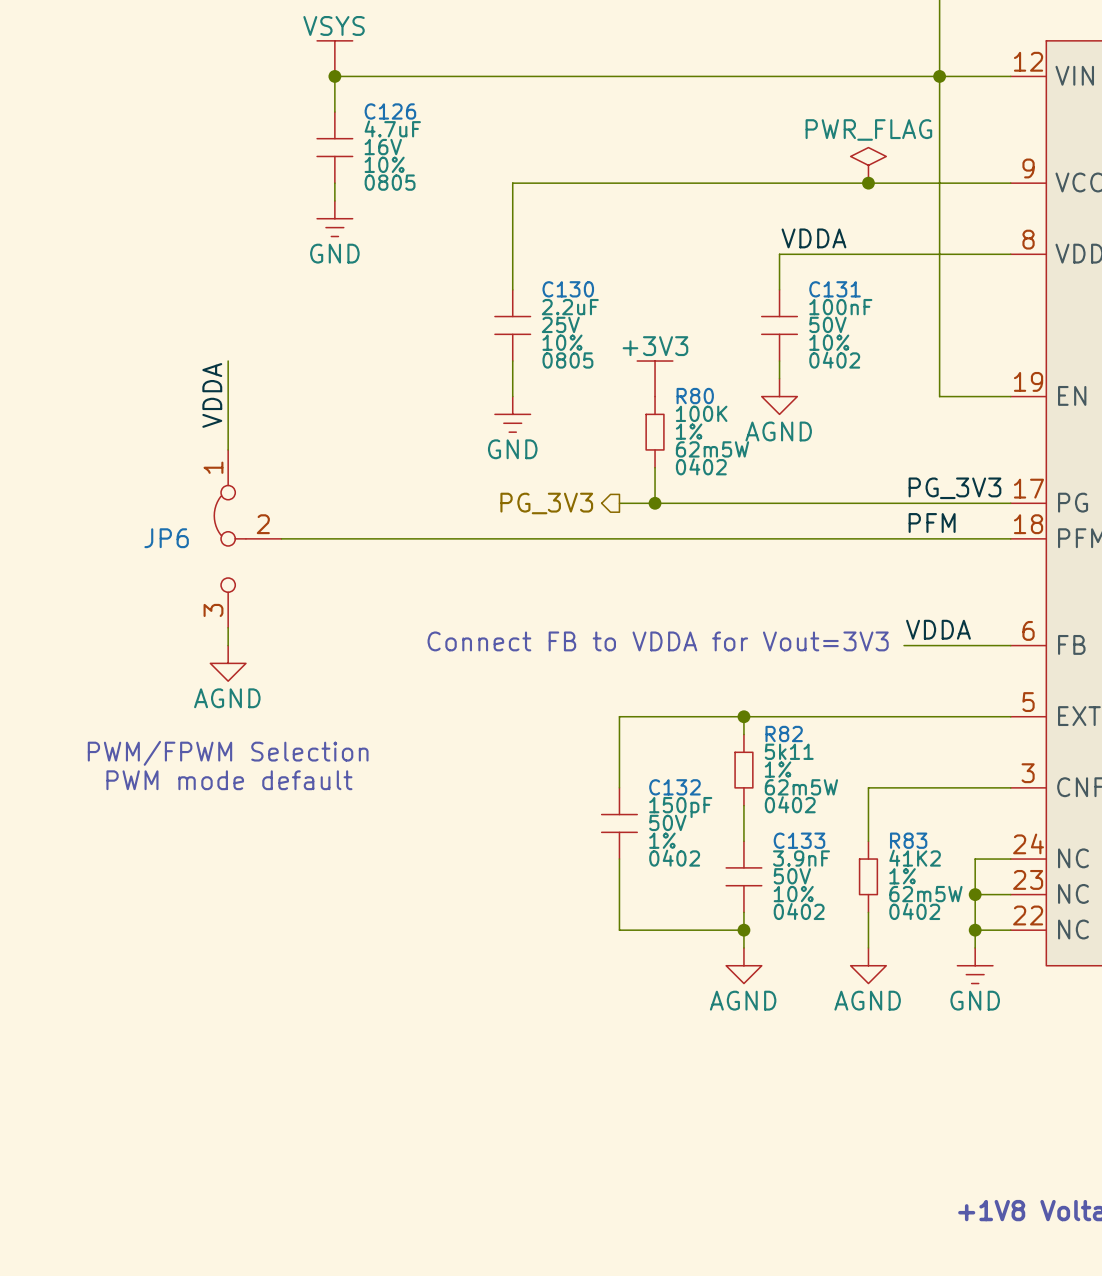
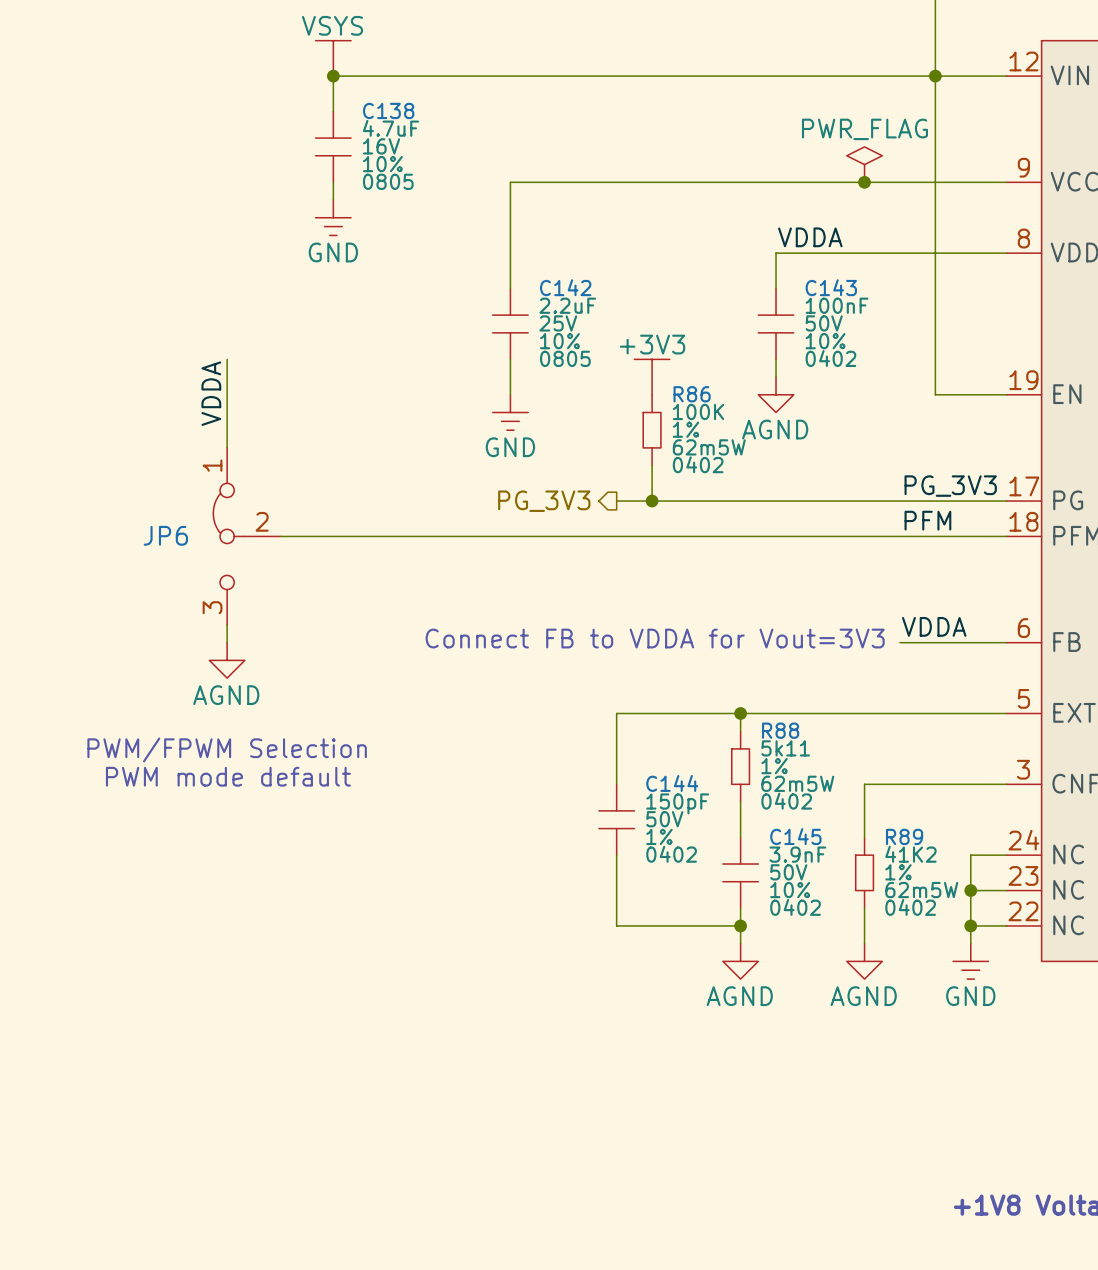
C126 name: C126 (390, 111) -> C138 (388, 110)
C130 name: C130 (568, 289) -> C142 (565, 287)
C131 name: C131 (835, 289) -> C143 (831, 287)
R80 name: R80 (695, 396) -> R86 (692, 394)
R82 name: R82 (784, 733) -> R88 (780, 730)
C132 name: C132 (674, 787) -> C144 (672, 783)
C133 name: C133 (799, 840) -> C145 (795, 836)
R83 name: R83 (908, 840) -> R89 (904, 836)

